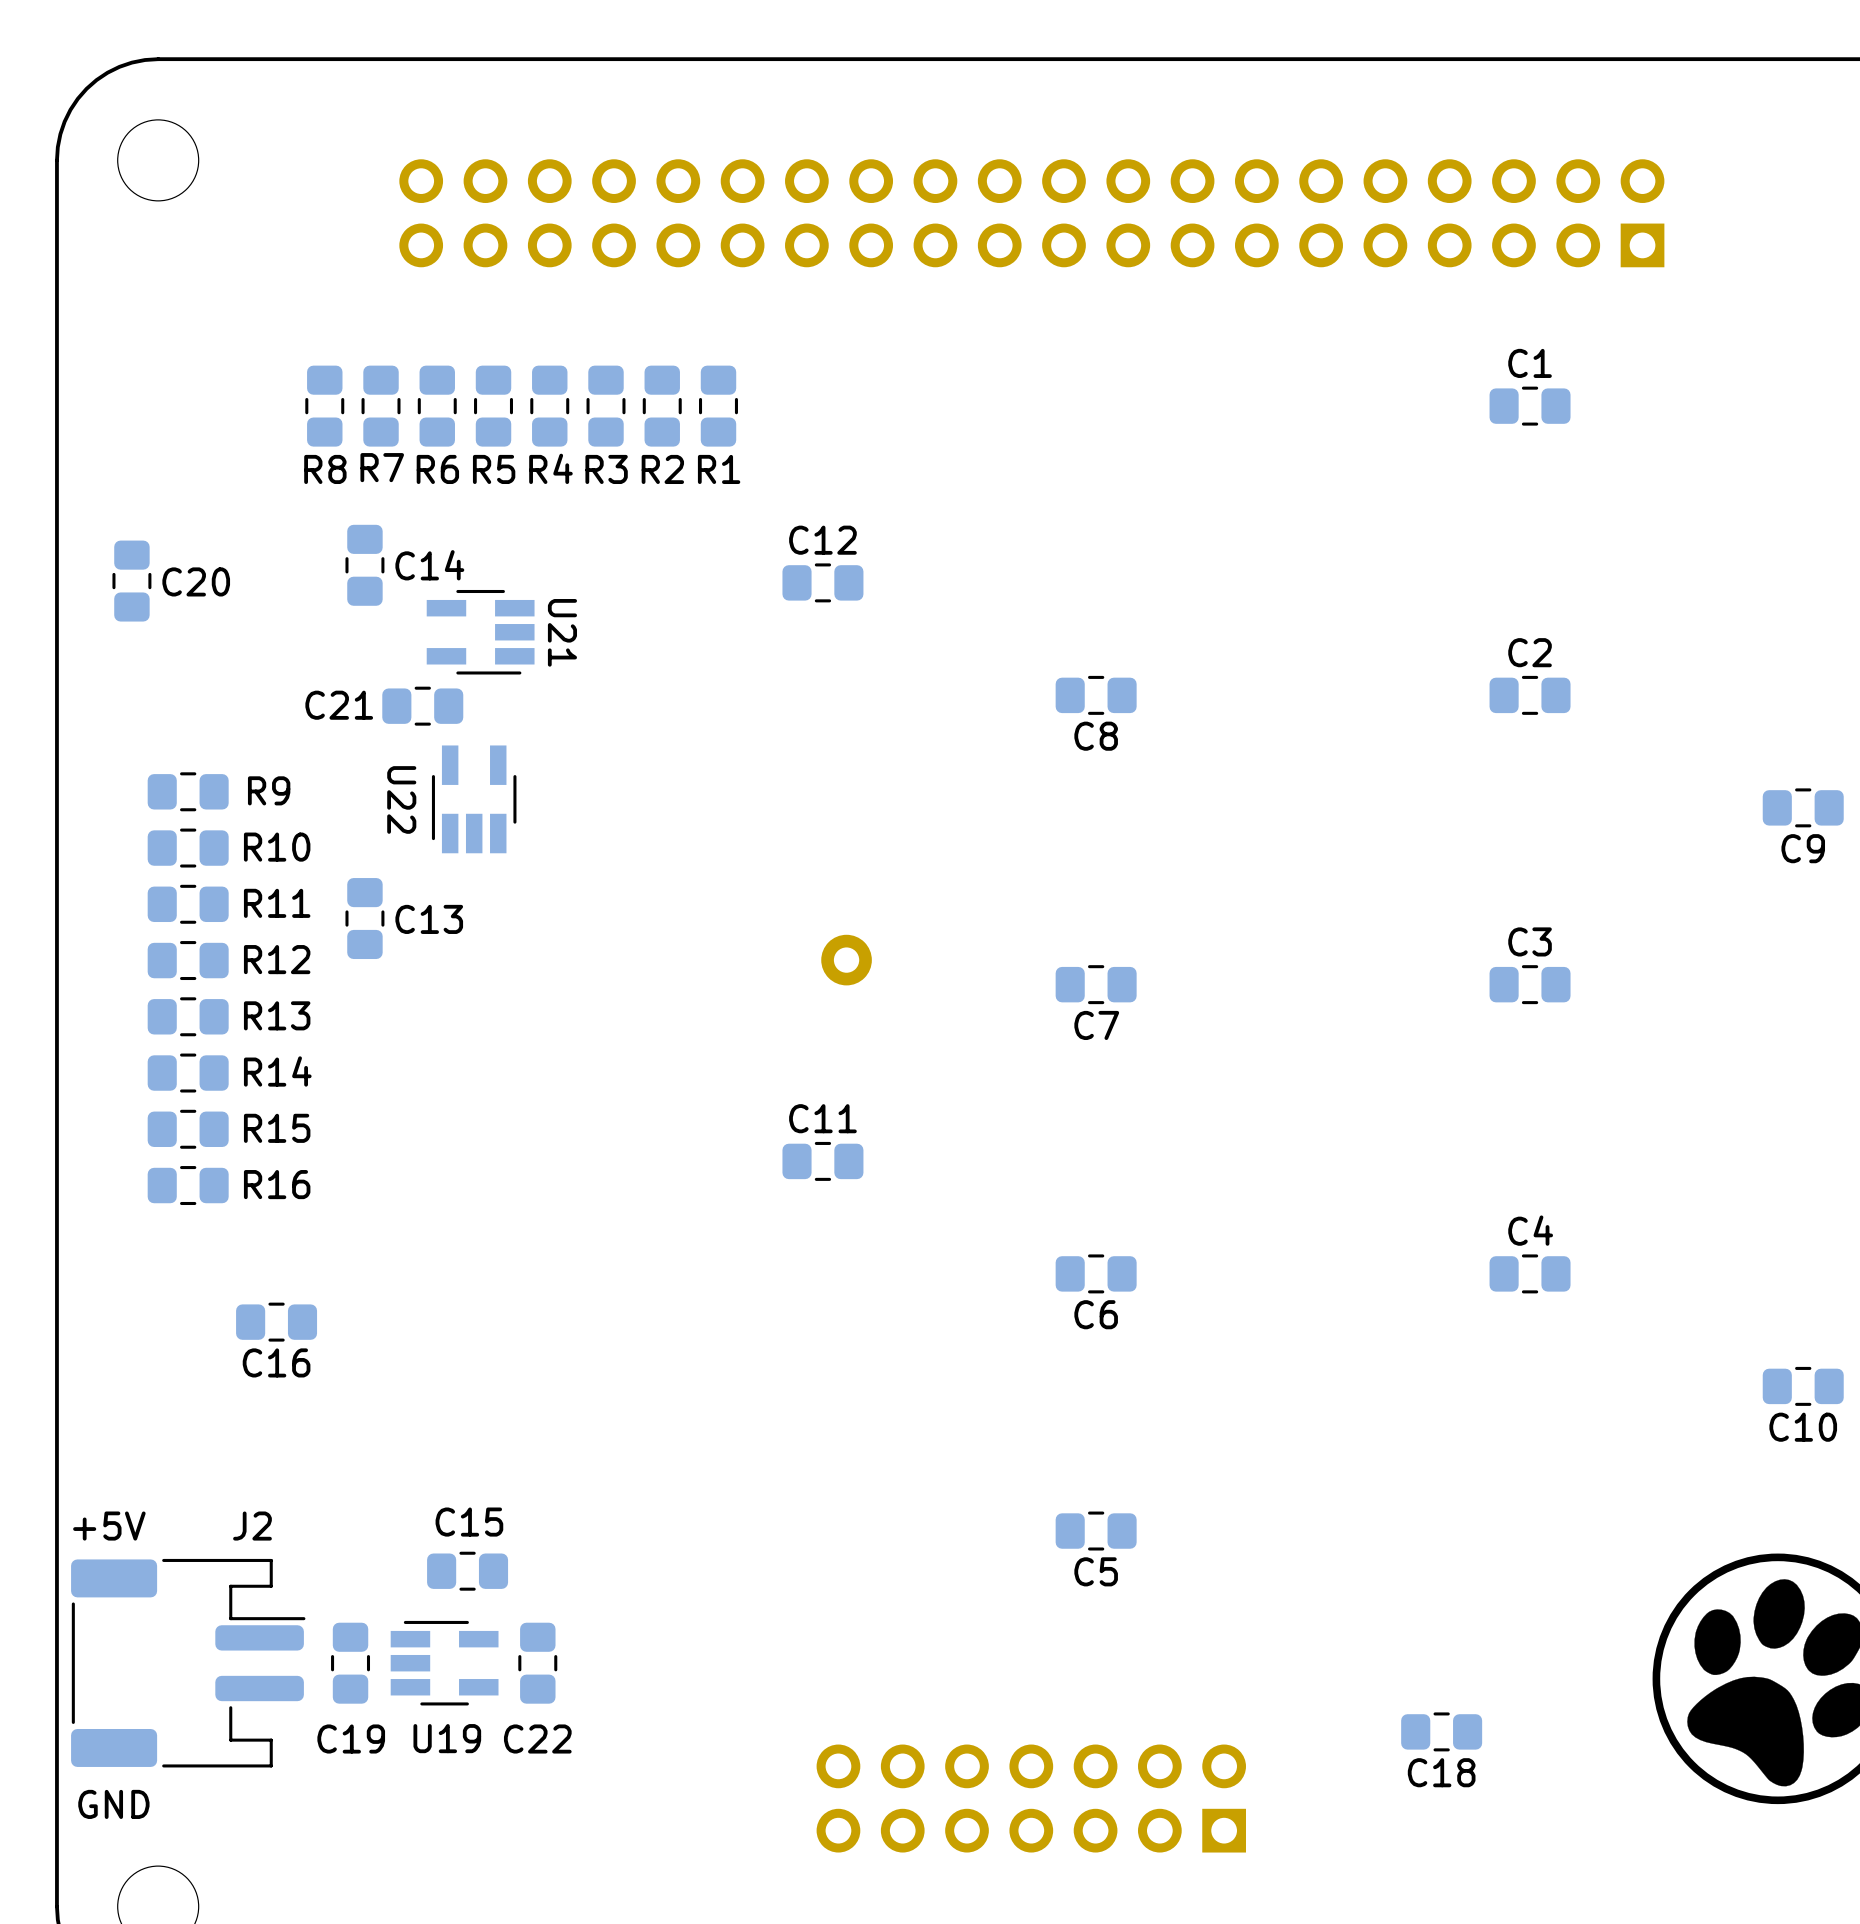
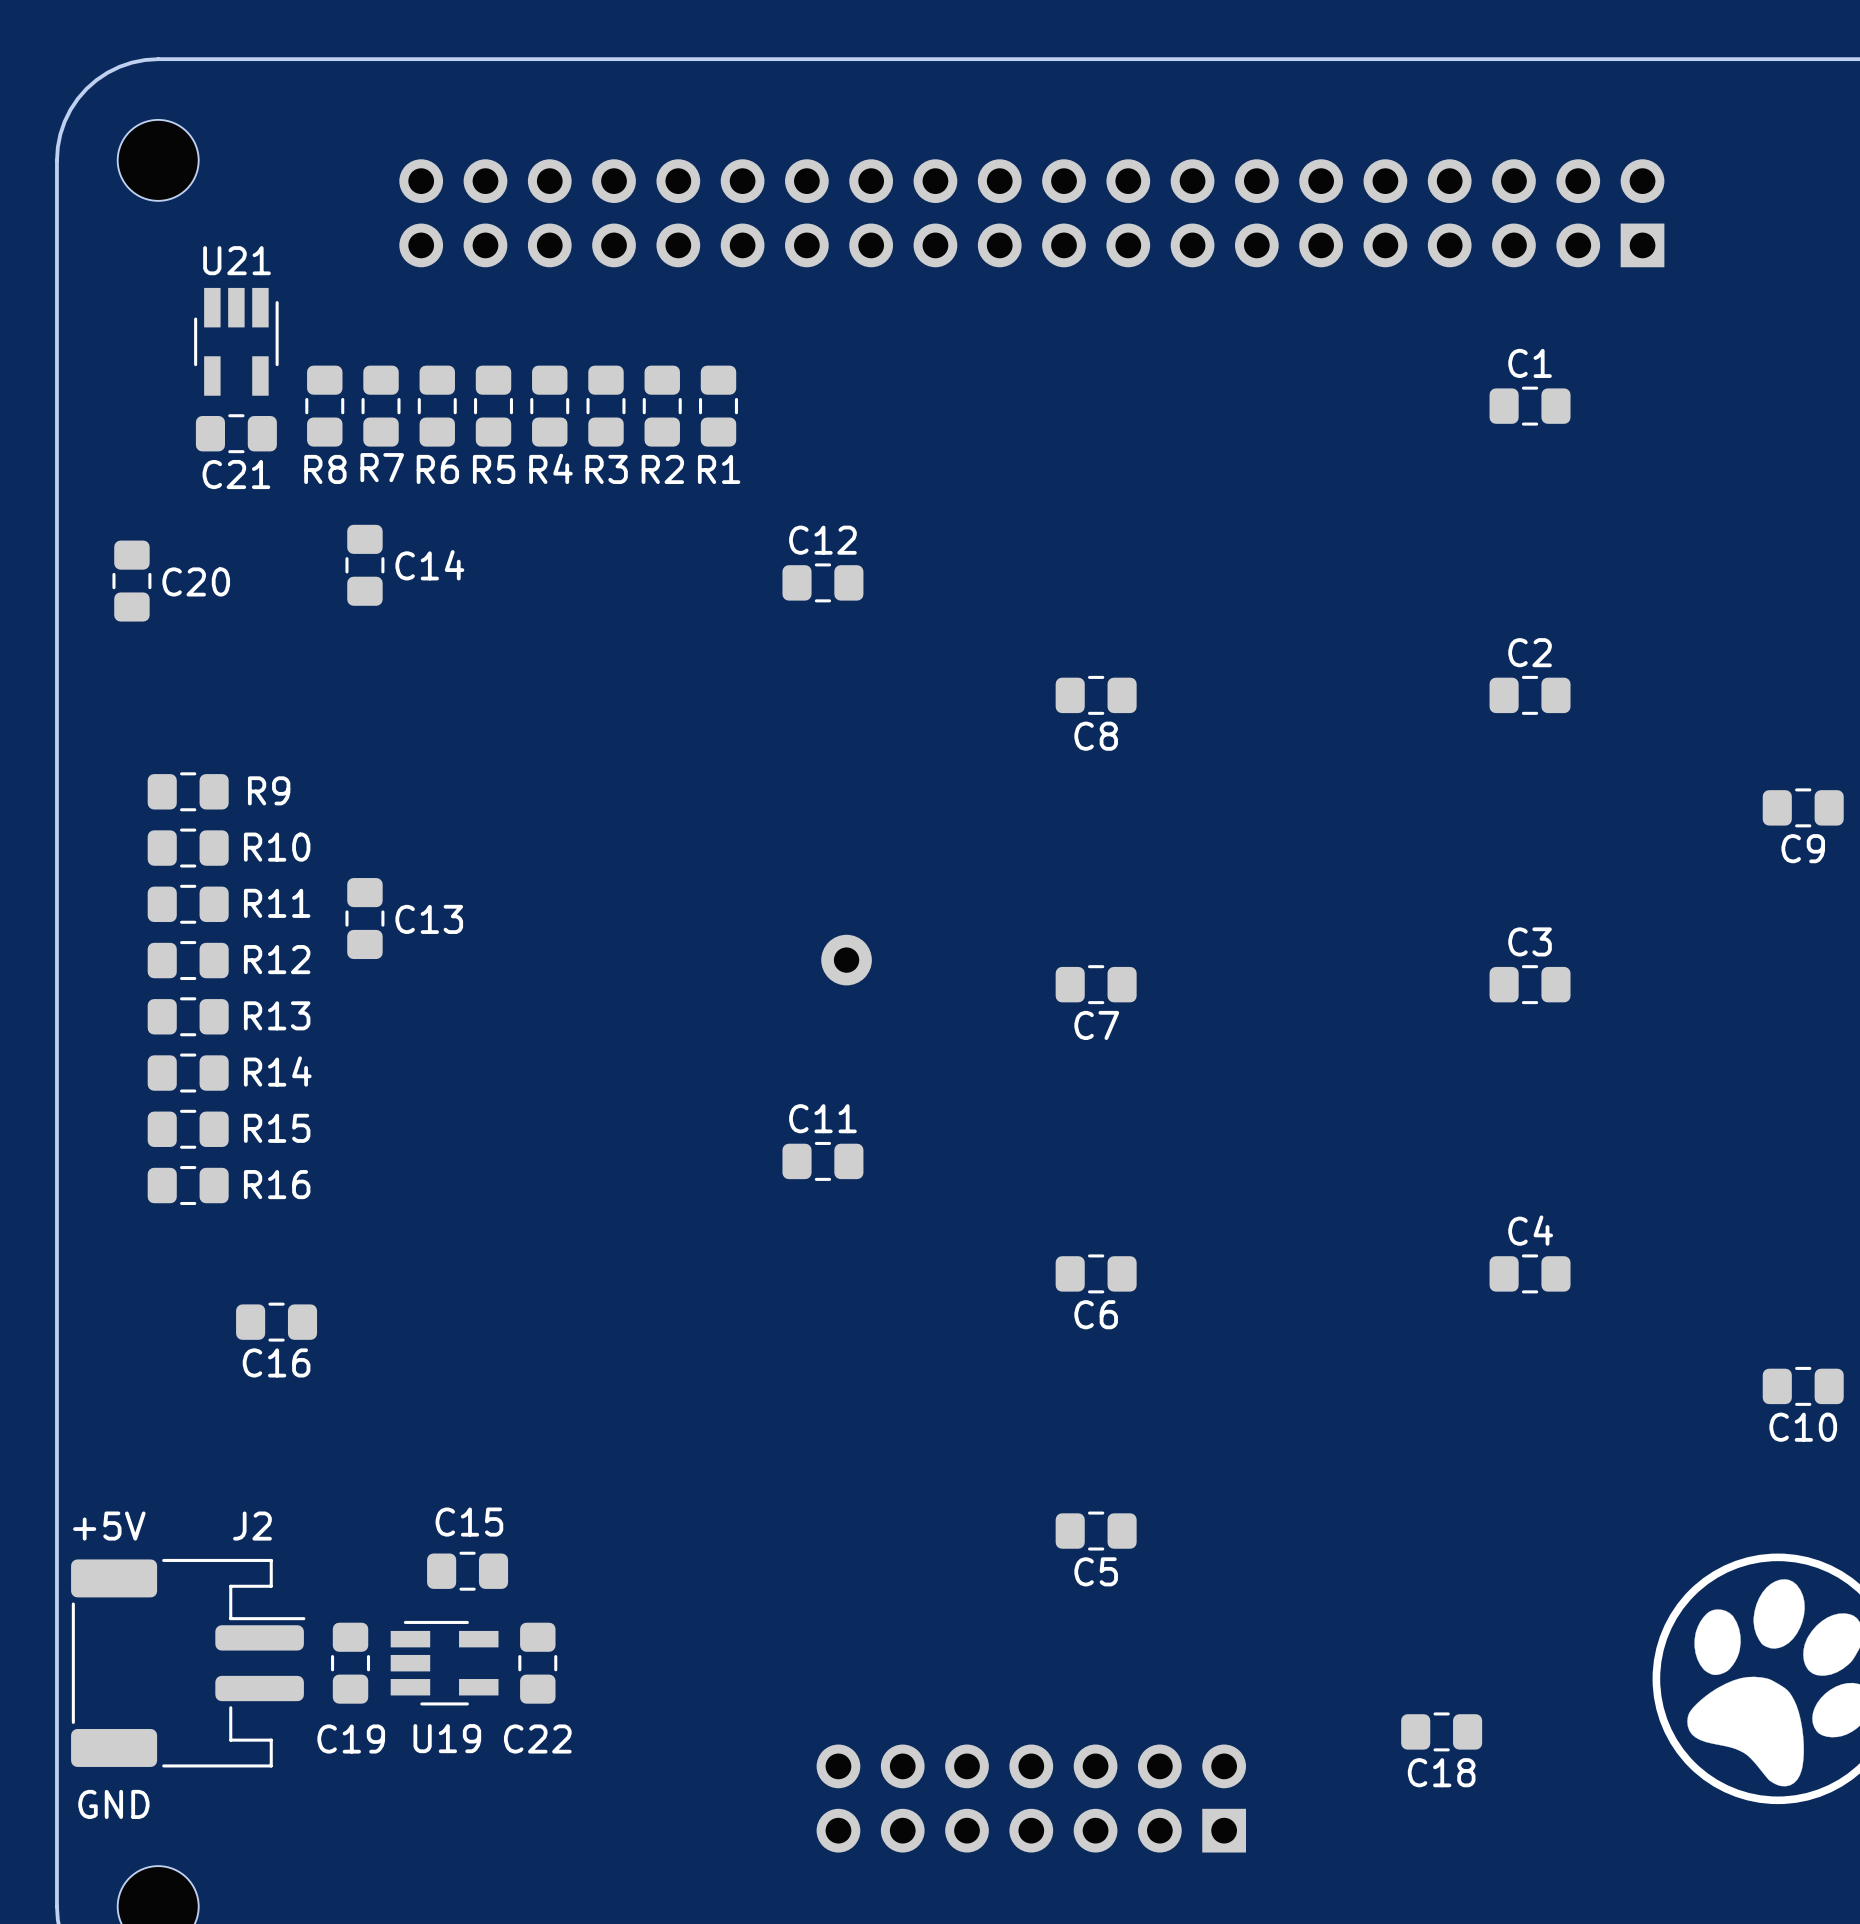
U21 rotation: 0° (480, 632) -> 90° counterclockwise (236, 341)
U21 position: (480, 632) -> (236, 341)
C21 name position: C21 (339, 705) -> C21 (236, 474)
C21 position: (422, 706) -> (236, 433)
U22: (474, 799) -> none

